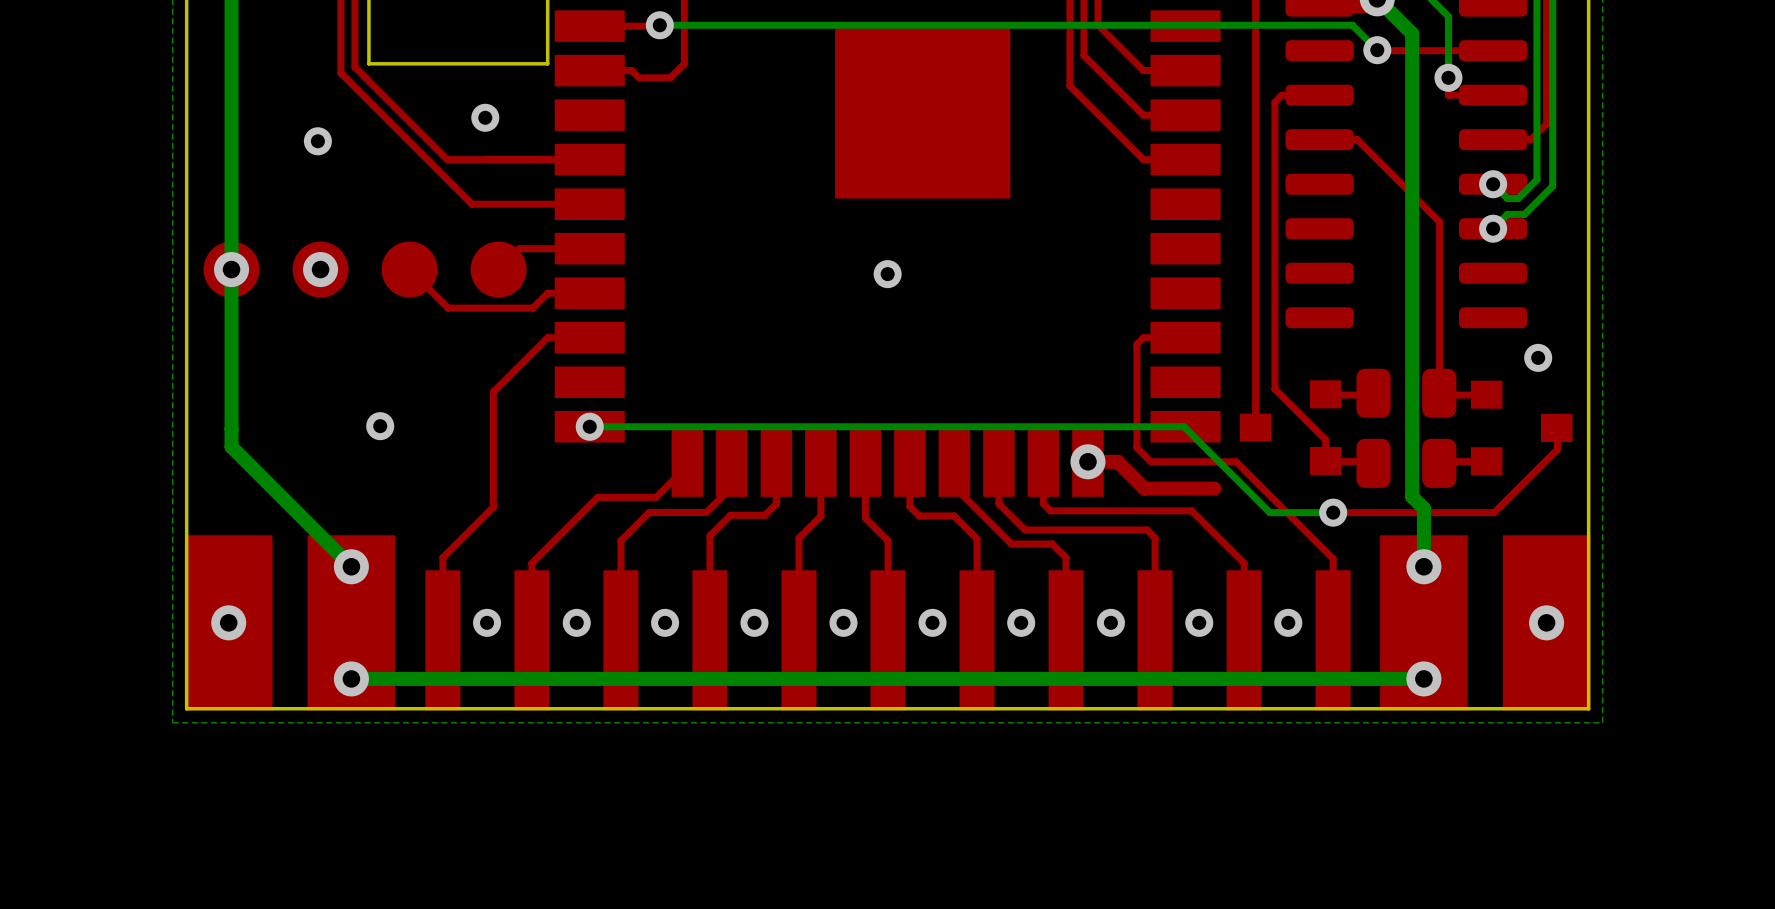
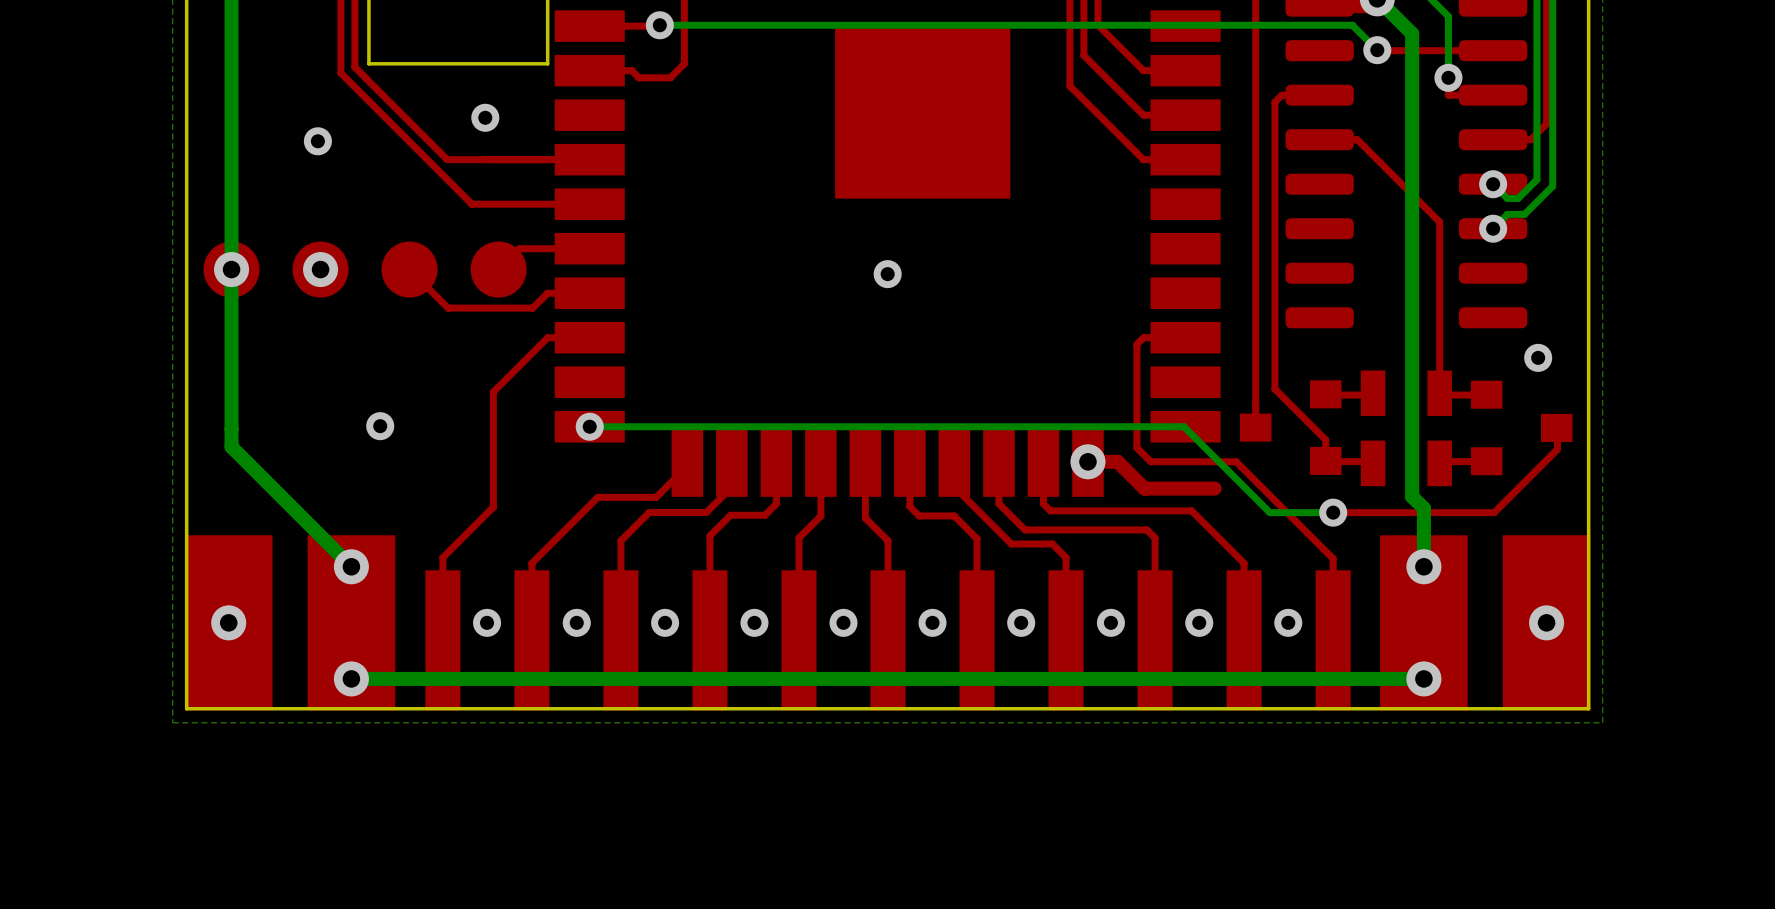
part footprint: [1356, 368, 1457, 418] -> [1360, 370, 1452, 417]
part footprint: [1356, 438, 1457, 488] -> [1360, 440, 1452, 487]

